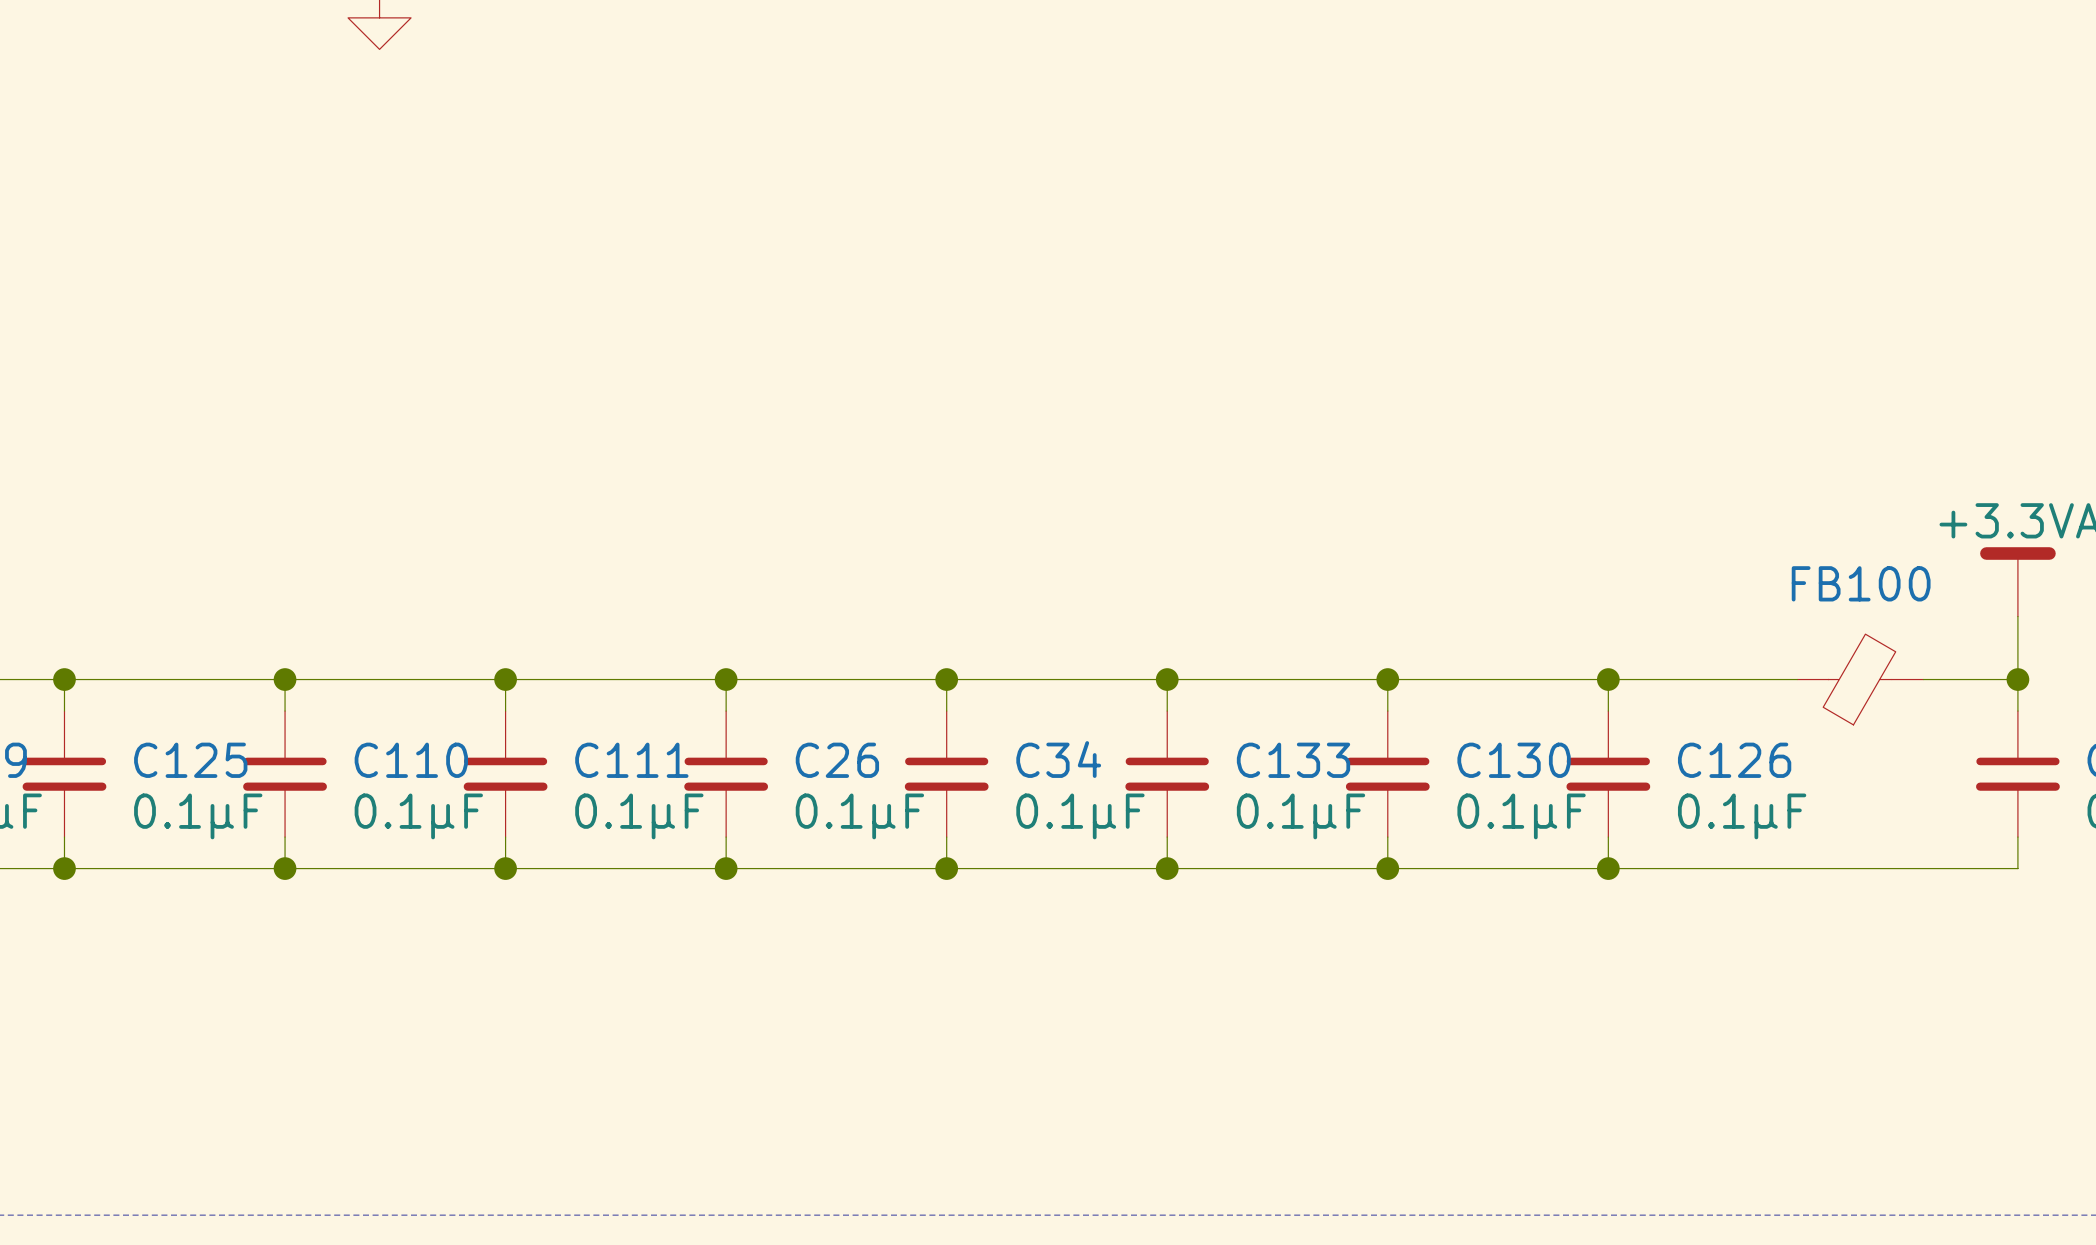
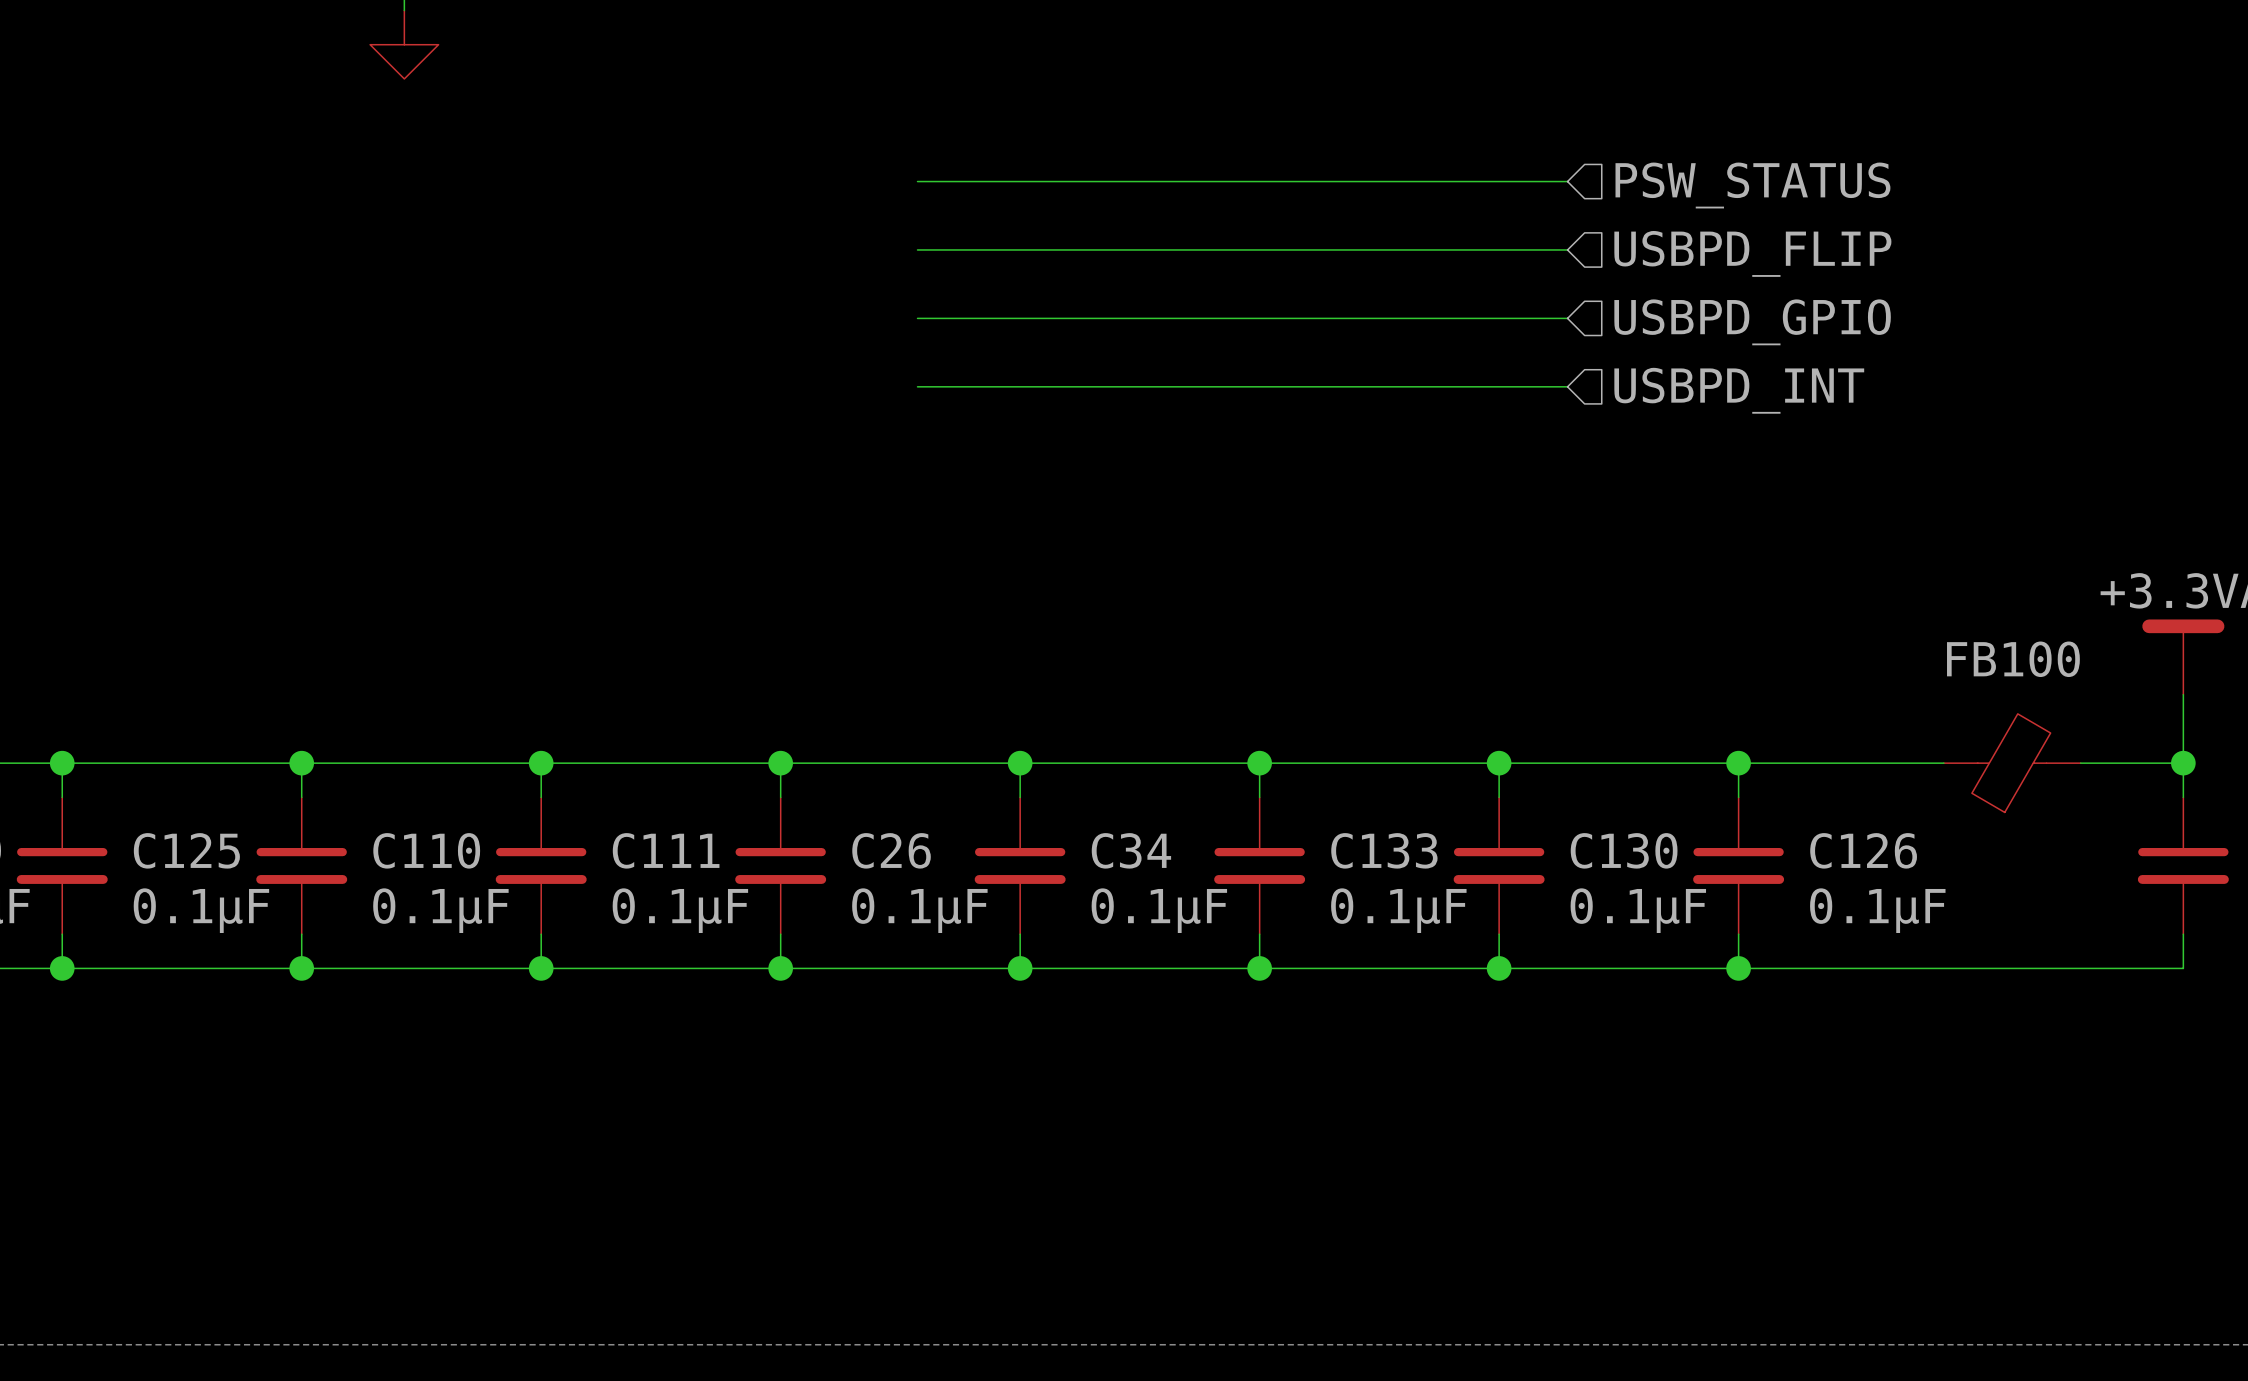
wire: none -> (917, 181) (1567, 181)
hierarchical label: none -> PSW_STATUS (1752, 185)
wire: none -> (917, 249) (1567, 249)
hierarchical label: none -> USBPD_FLIP (1752, 253)
wire: none -> (917, 318) (1567, 318)
hierarchical label: none -> USBPD_GPIO (1752, 322)
wire: none -> (917, 386) (1567, 386)
hierarchical label: none -> USBPD_INT (1739, 390)

